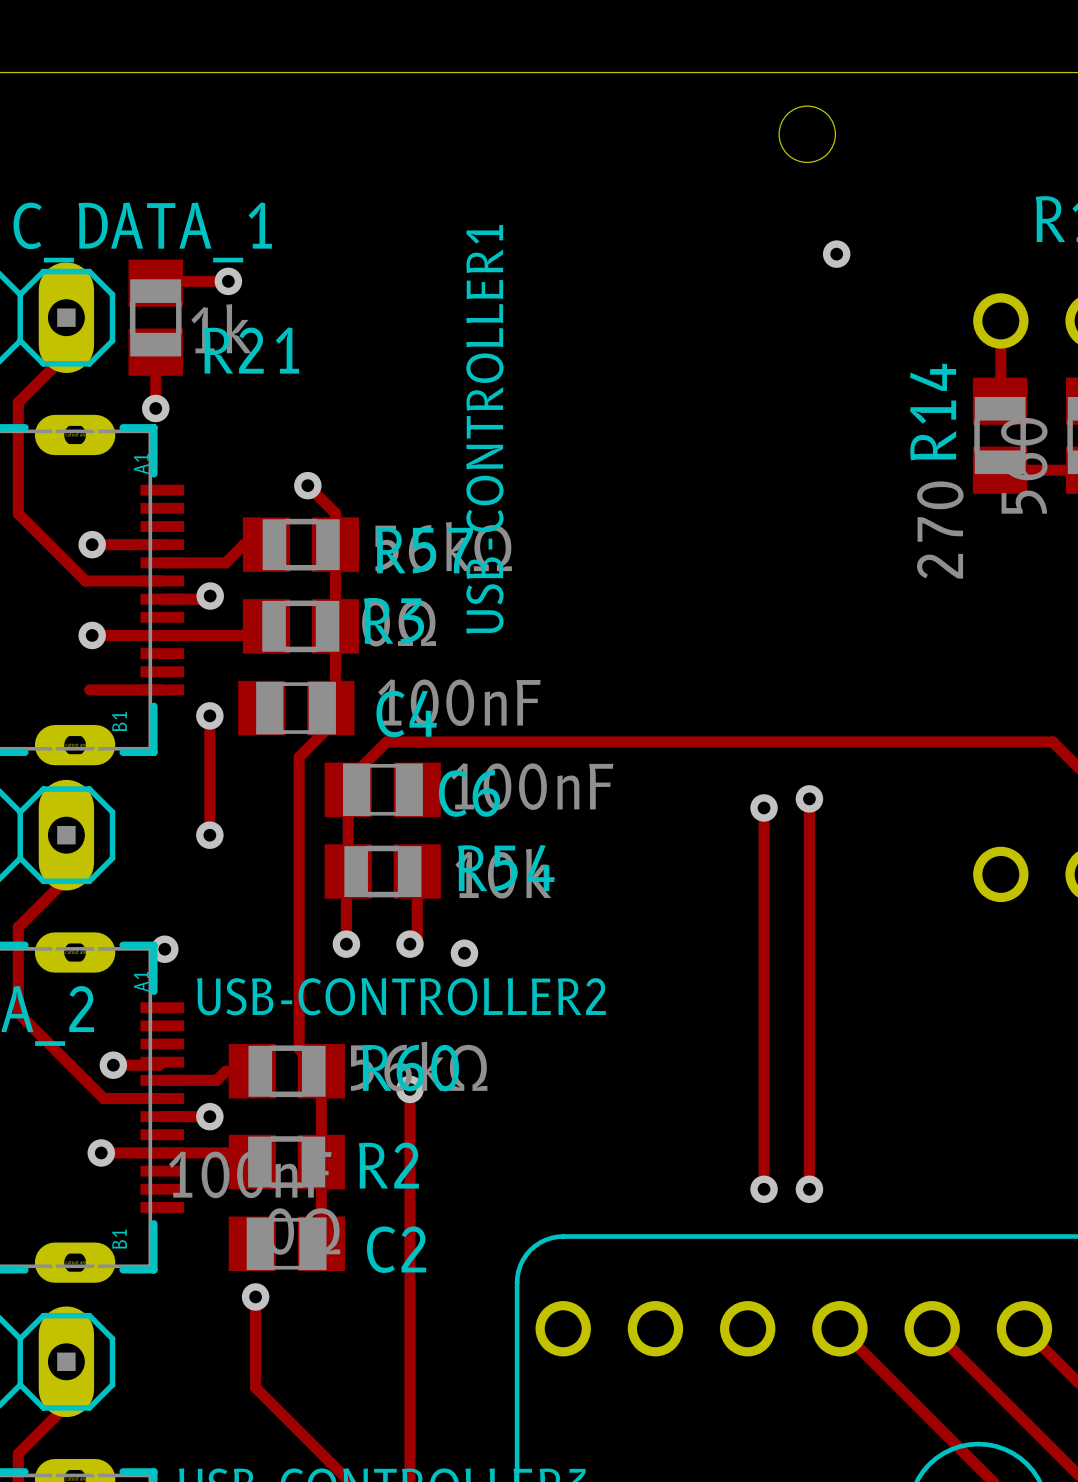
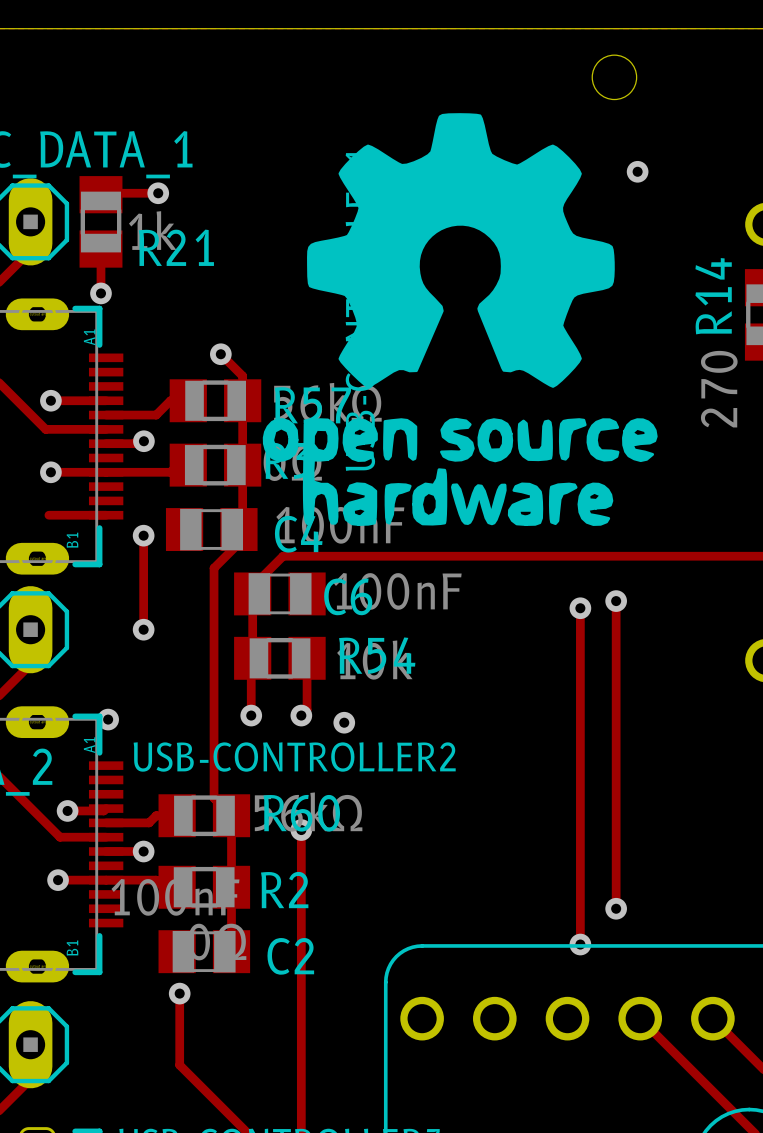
drawing: none -> [262, 113, 658, 526]
track: none -> (580, 908) (580, 944)
via position: (764, 1189) -> (580, 944)

